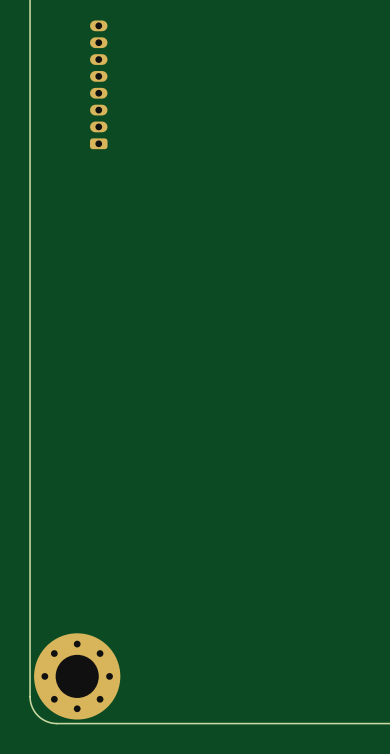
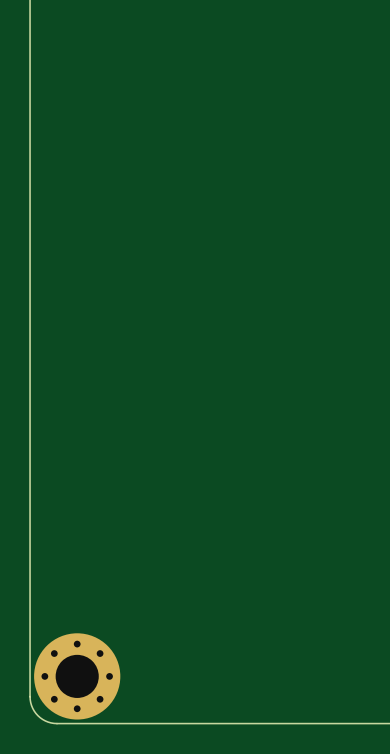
part: (98, 84) -> none

